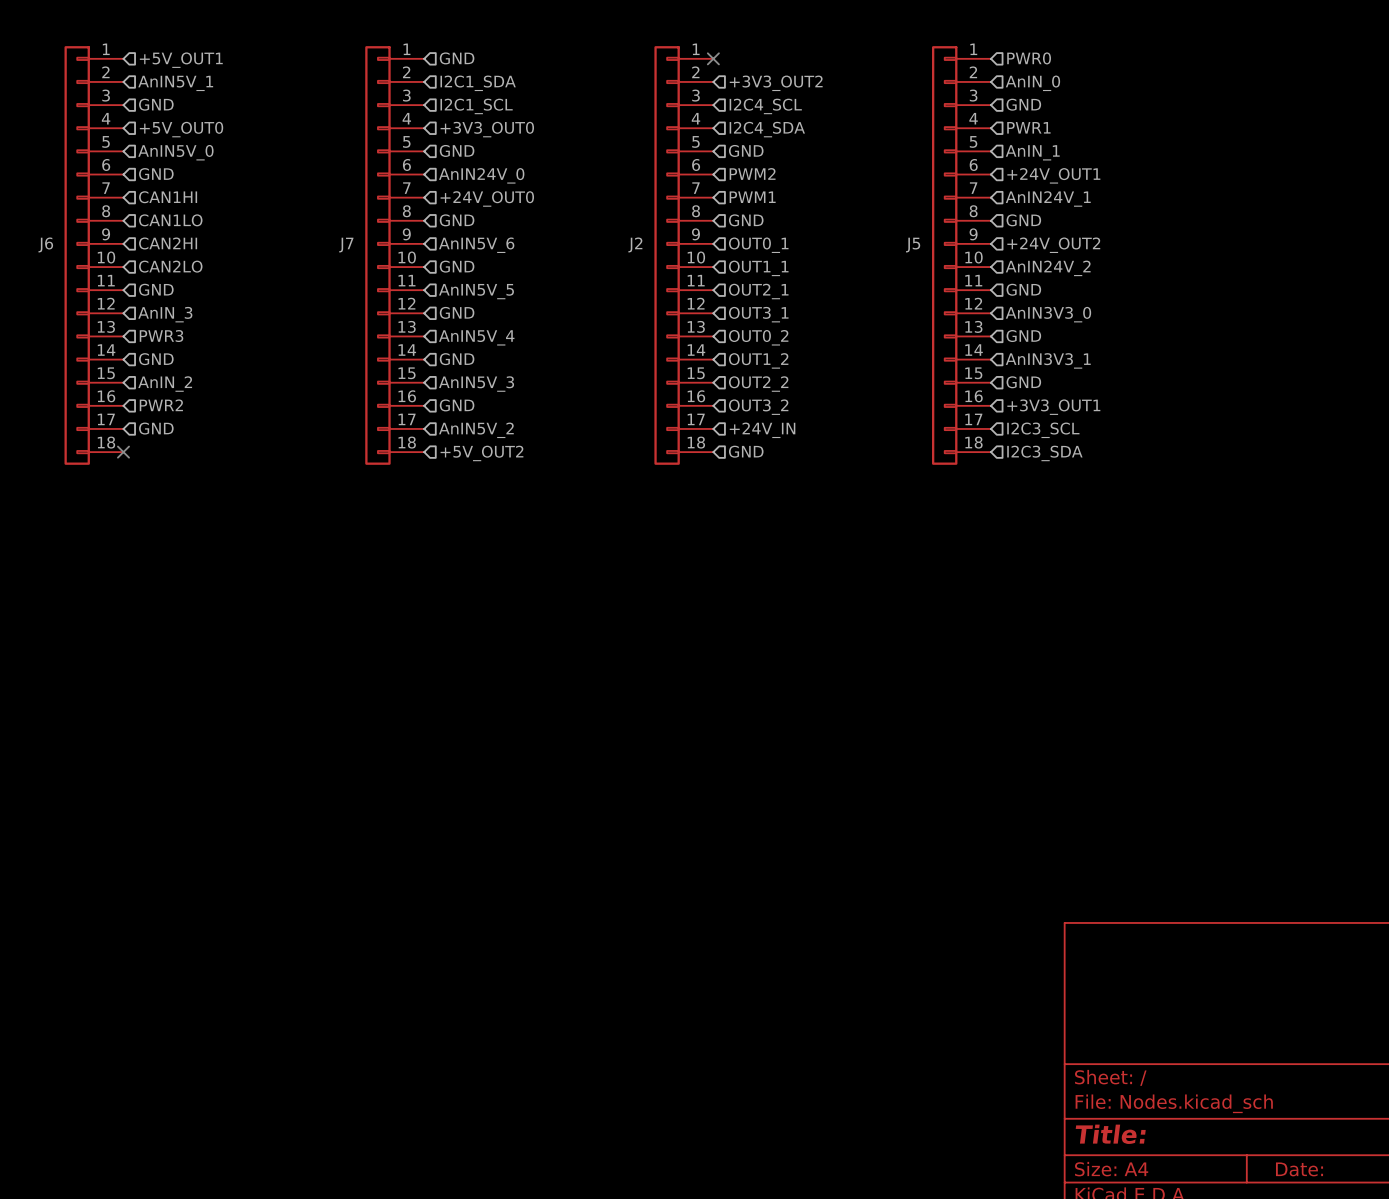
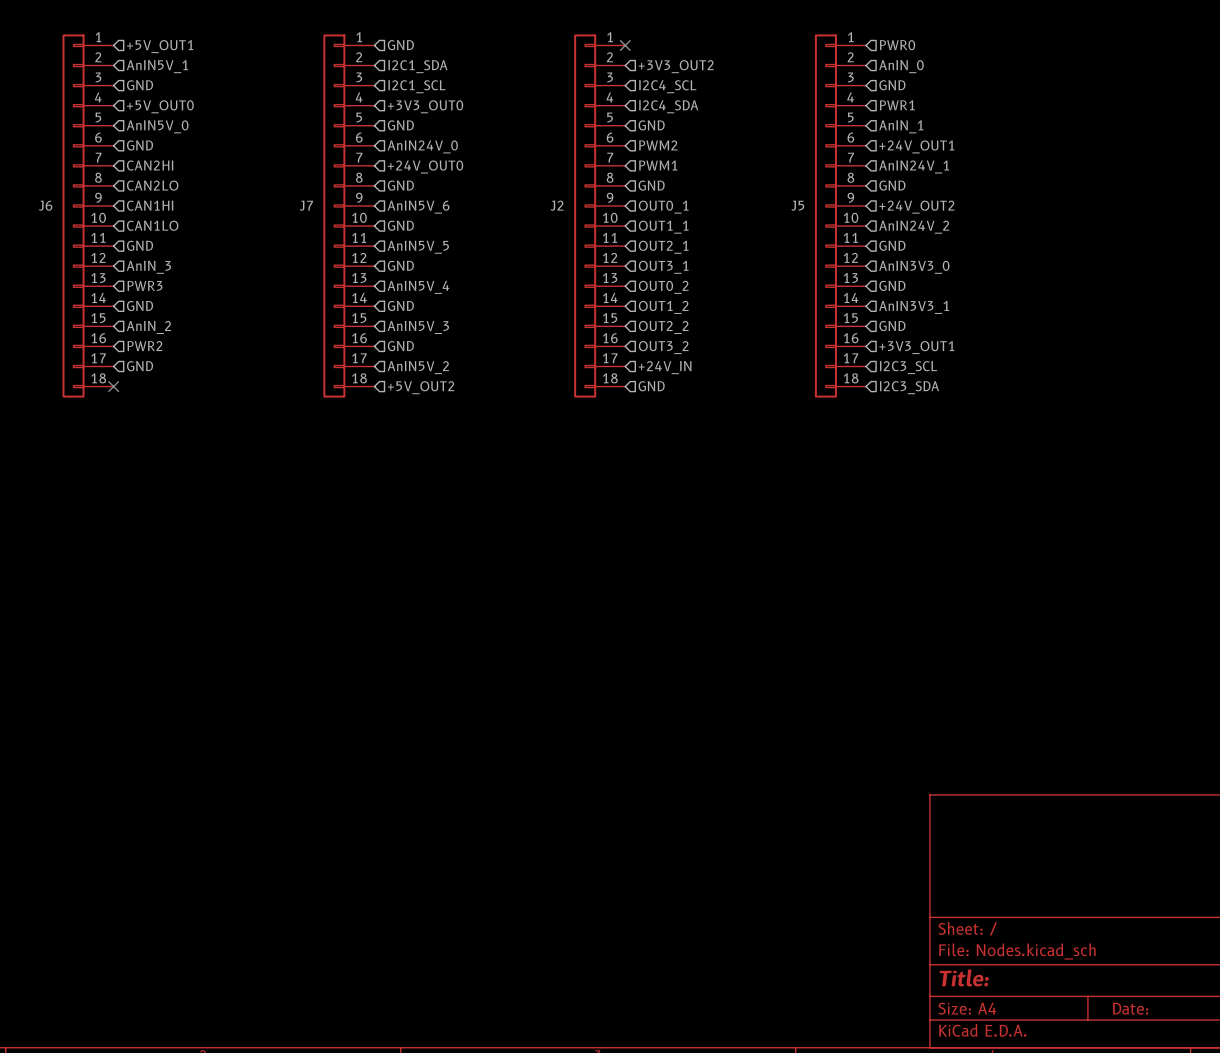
hierarchical label: CAN1HI (168, 197) -> CAN2HI (150, 165)
hierarchical label: CAN1LO (170, 220) -> CAN2LO (152, 185)
hierarchical label: CAN2HI (168, 243) -> CAN1HI (150, 205)
hierarchical label: CAN2LO (170, 266) -> CAN1LO (152, 225)

